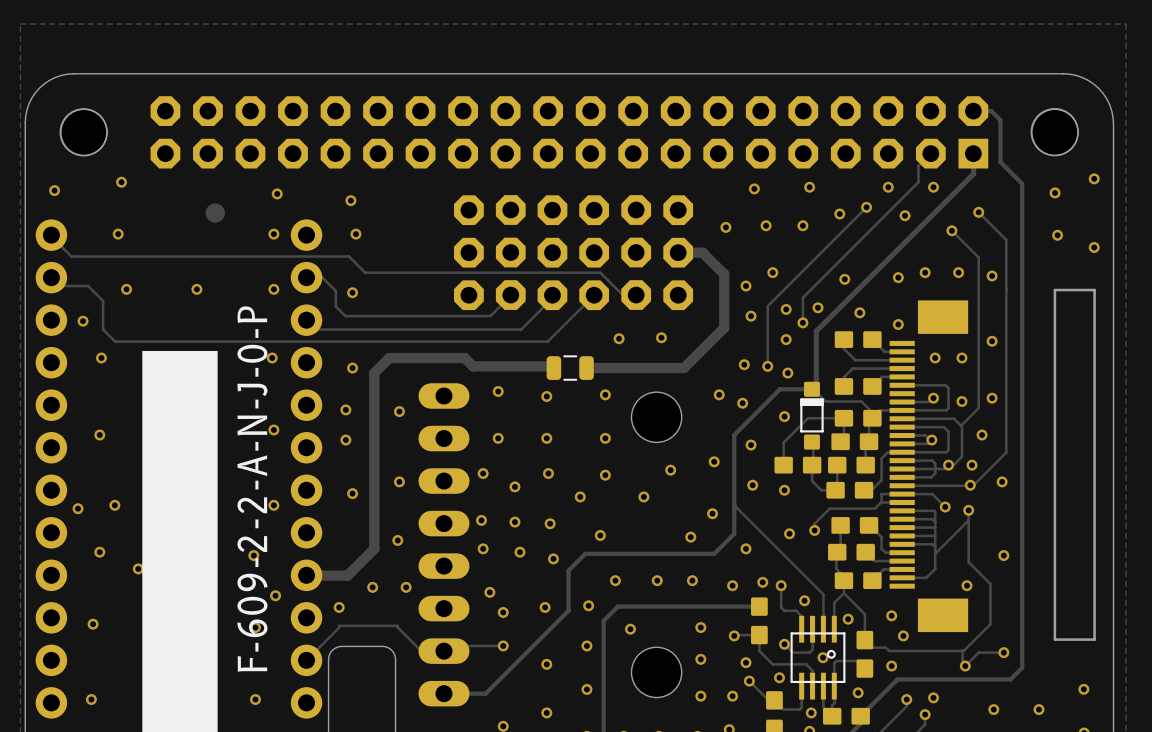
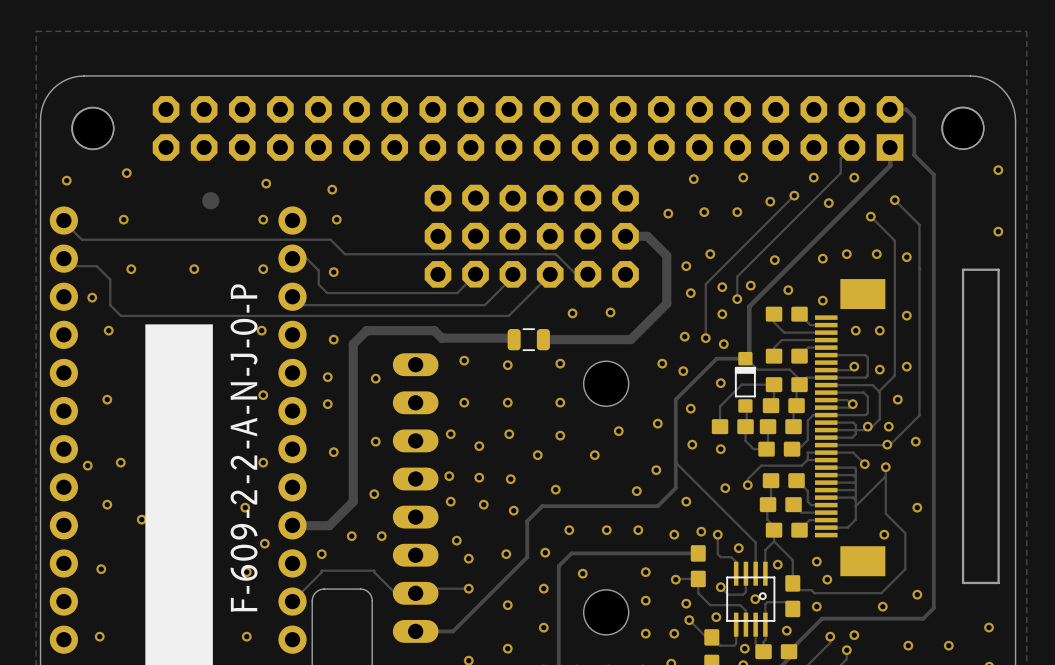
via: (1055, 192) -> none
via: (1057, 235) -> none
track: (962, 650) (962, 663) (965, 666) (978, 652) (1003, 652) -> none

